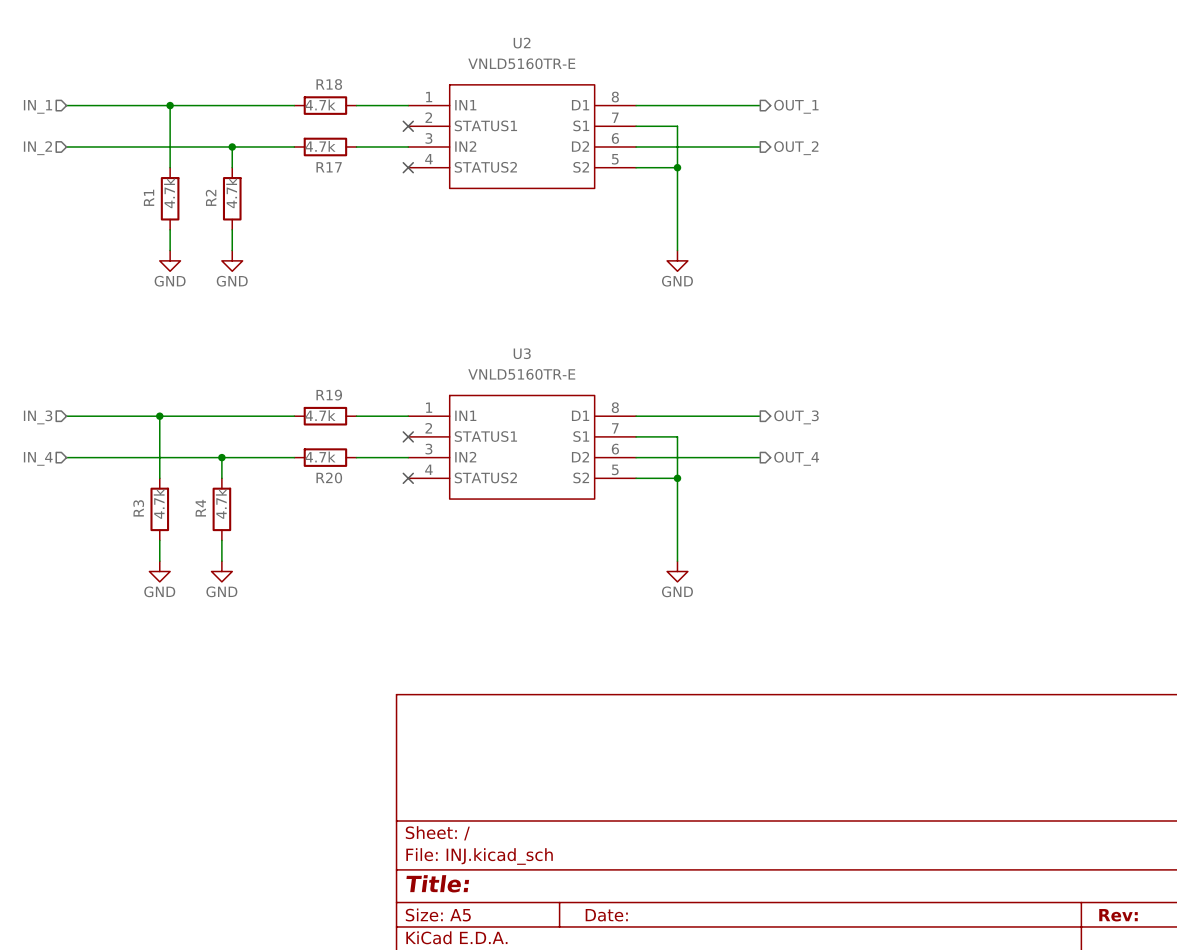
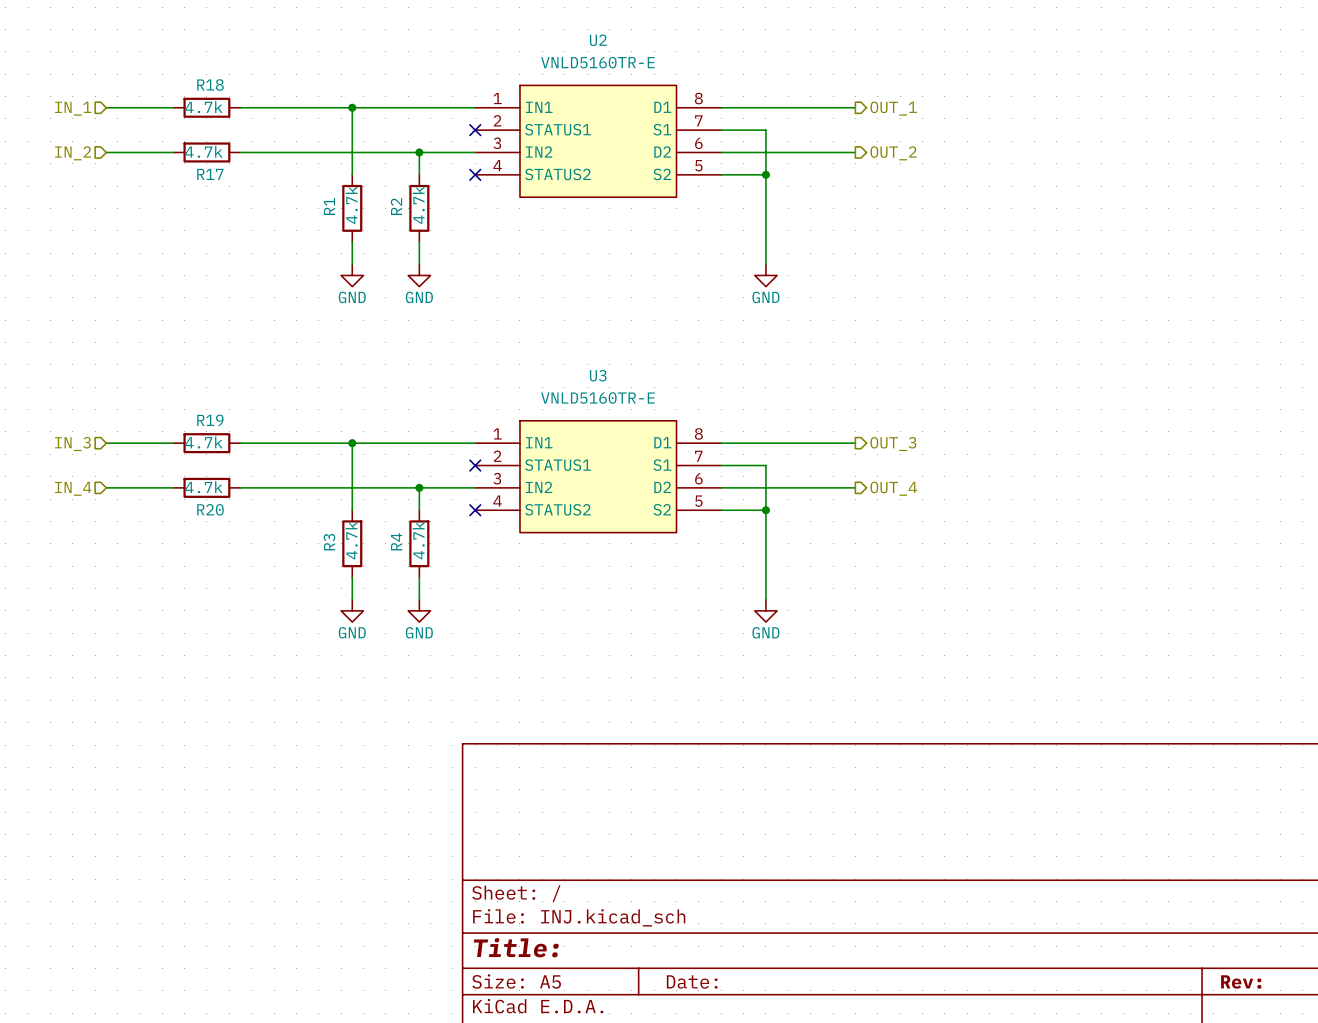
wire: (128, 105) (190, 105) -> none
wire: (170, 105) (170, 167) -> none
junction: (170, 105) -> none
junction: none -> (352, 107)
R18 position: (325, 105) -> (206, 107)
wire: none -> (419, 107) (352, 107) (352, 174)
wire: (128, 146) (190, 146) -> none
wire: (232, 146) (232, 167) -> none
junction: (232, 146) -> none
wire: none -> (352, 152) (419, 152) (419, 174)
R17 position: (325, 146) -> (206, 152)
junction: none -> (419, 152)
R1 position: (170, 198) -> (352, 208)
R2 position: (232, 198) -> (419, 208)
wire: (170, 229) (170, 250) -> (352, 241) (352, 264)
wire: (232, 229) (232, 250) -> (419, 241) (419, 264)
power symbol: GND (170, 260) -> none
power symbol: GND (232, 260) -> none
power symbol: none -> GND (352, 275)
power symbol: none -> GND (419, 275)
wire: (128, 416) (190, 416) -> none
wire: (159, 416) (159, 478) -> none
junction: (159, 416) -> none
junction: none -> (352, 443)
R19 position: (325, 416) -> (206, 443)
wire: none -> (419, 443) (352, 443) (352, 510)
wire: (128, 457) (190, 457) -> none
wire: (221, 457) (221, 478) -> none
junction: (221, 457) -> none
wire: none -> (352, 487) (419, 487) (419, 510)
R20 position: (325, 457) -> (206, 487)
junction: none -> (419, 487)
R3 position: (159, 509) -> (352, 543)
R4 position: (221, 509) -> (419, 543)
wire: (159, 540) (159, 561) -> (352, 577) (352, 599)
wire: (221, 540) (221, 561) -> (419, 577) (419, 599)
power symbol: GND (159, 571) -> none
power symbol: GND (221, 571) -> none
power symbol: none -> GND (352, 610)
power symbol: none -> GND (419, 610)

